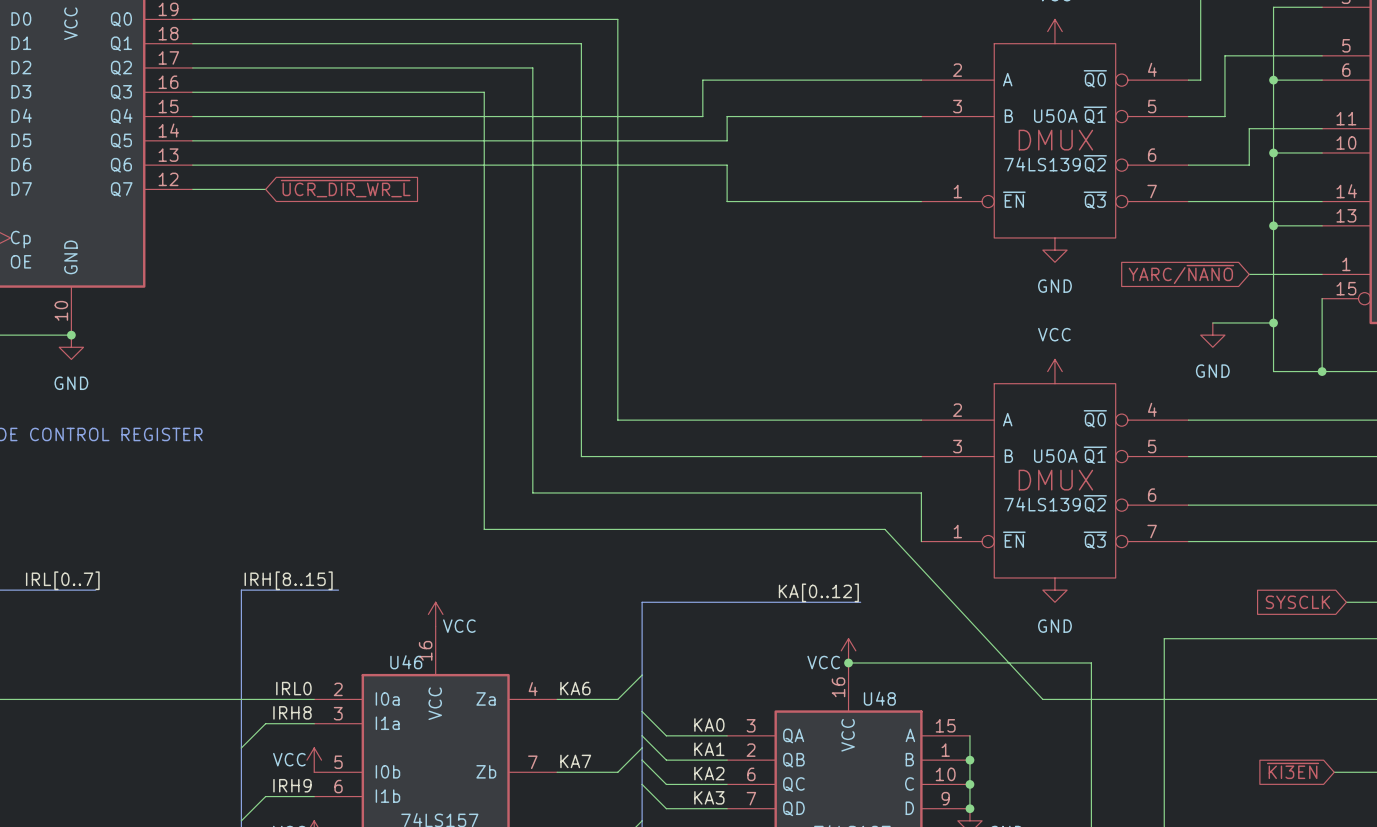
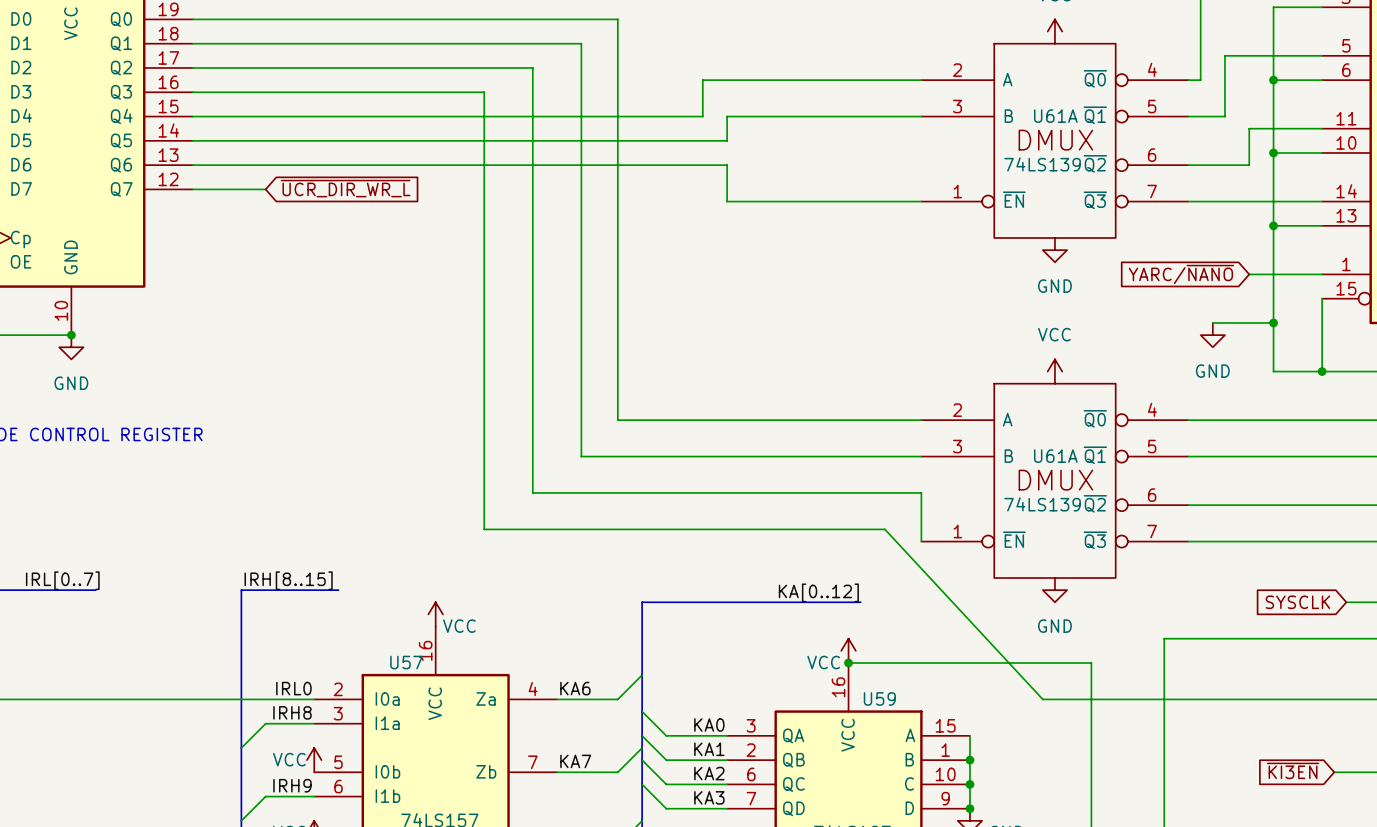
U50A name: U50A (1055, 116) -> U61A (1055, 116)
U50A name: U50A (1055, 456) -> U61A (1055, 456)
U46 name: U46 (406, 662) -> U57 (406, 662)
U48 name: U48 (879, 698) -> U59 (879, 698)

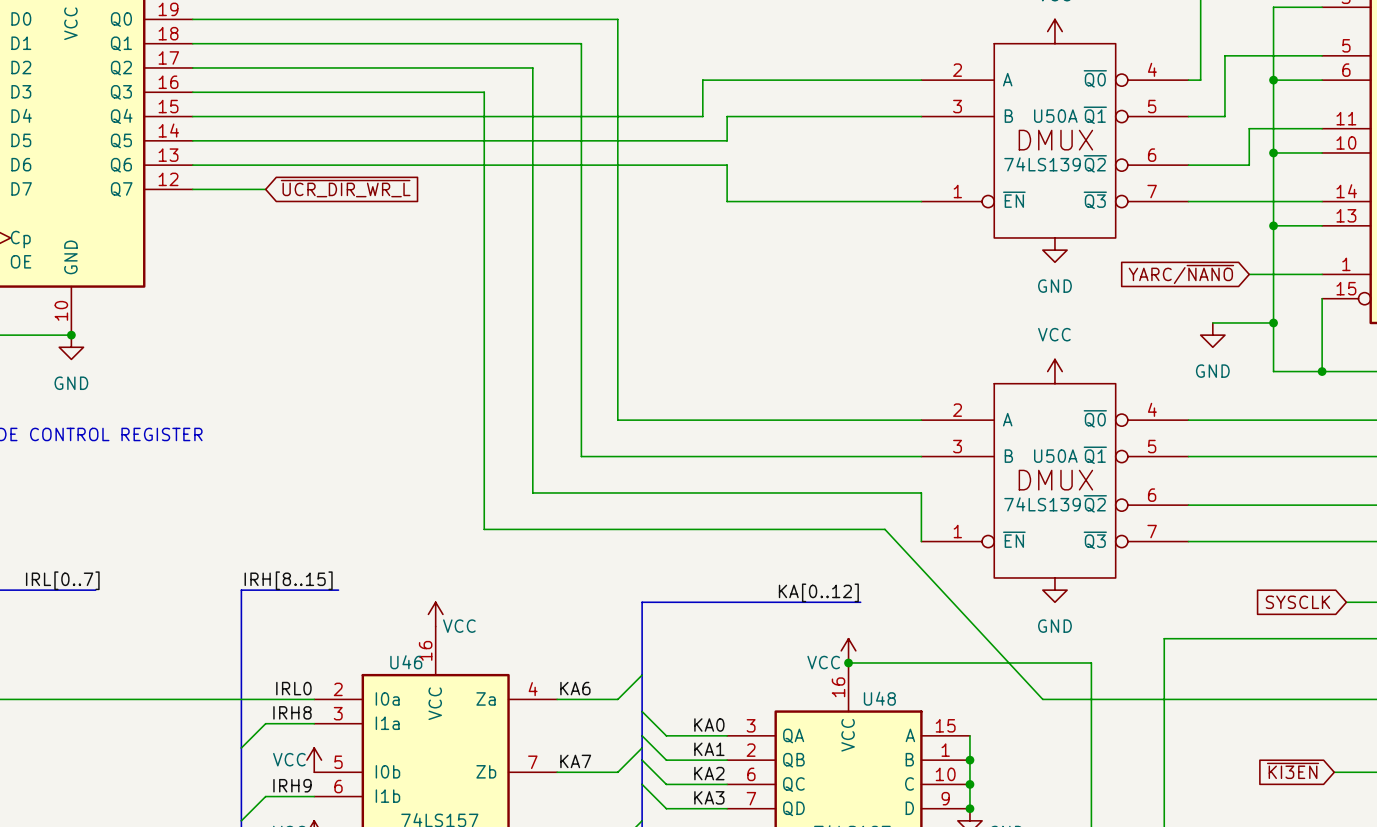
U61A name: U61A (1055, 116) -> U50A (1055, 116)
U61A name: U61A (1055, 456) -> U50A (1055, 456)
U57 name: U57 (406, 662) -> U46 (406, 662)
U59 name: U59 (879, 698) -> U48 (879, 698)

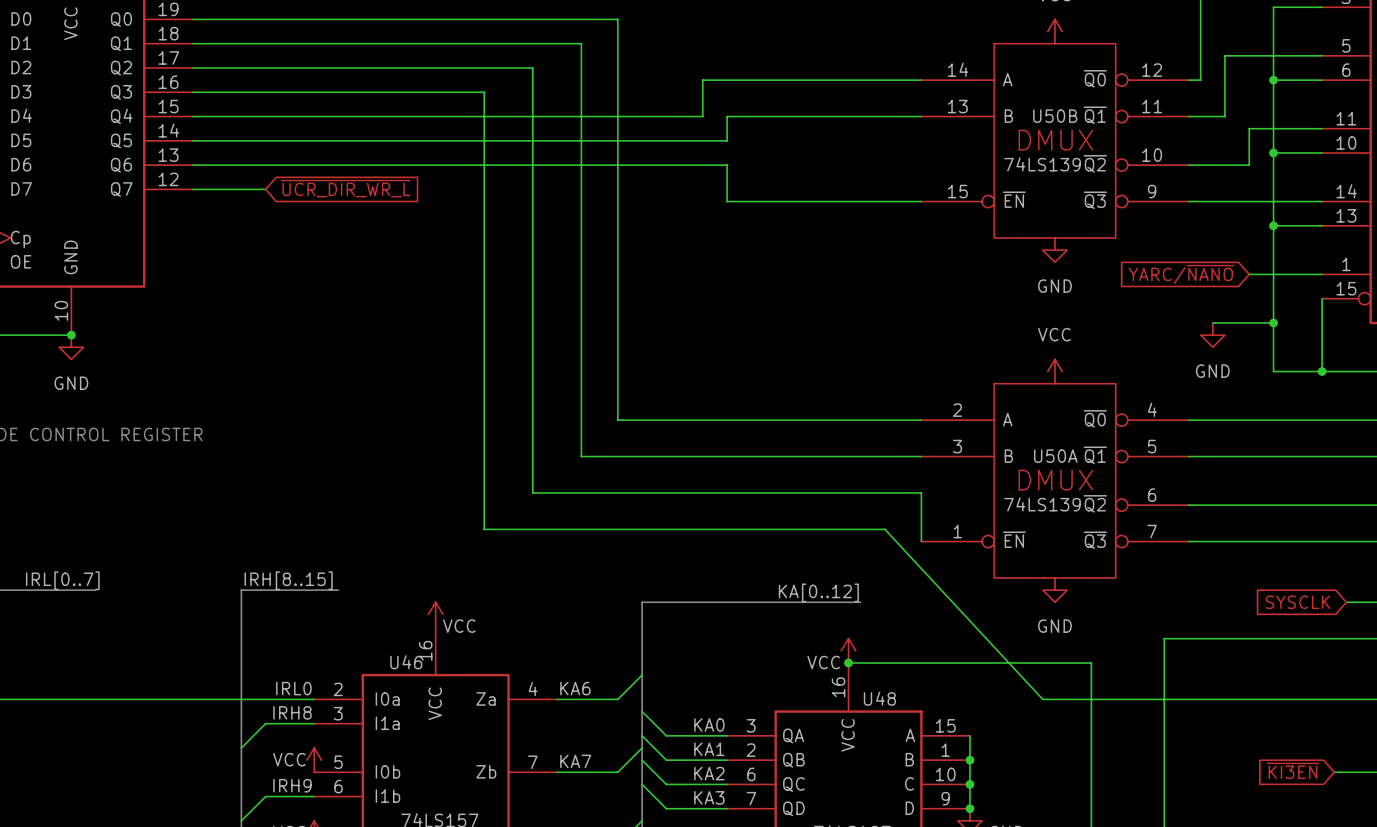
U50A pin number: 4 (1152, 69) -> 12 (1152, 70)
U50A pin number: 2 (957, 70) -> 14 (958, 69)
U50A pin number: 3 (957, 106) -> 13 (957, 106)
U50A pin number: 5 (1152, 106) -> 11 (1152, 106)
U50A name: U50A (1055, 116) -> U50B (1055, 116)
U50A pin number: 6 (1152, 155) -> 10 (1152, 155)
U50A pin number: 1 (957, 191) -> 15 (957, 191)
U50A pin number: 7 (1152, 191) -> 9 (1152, 191)

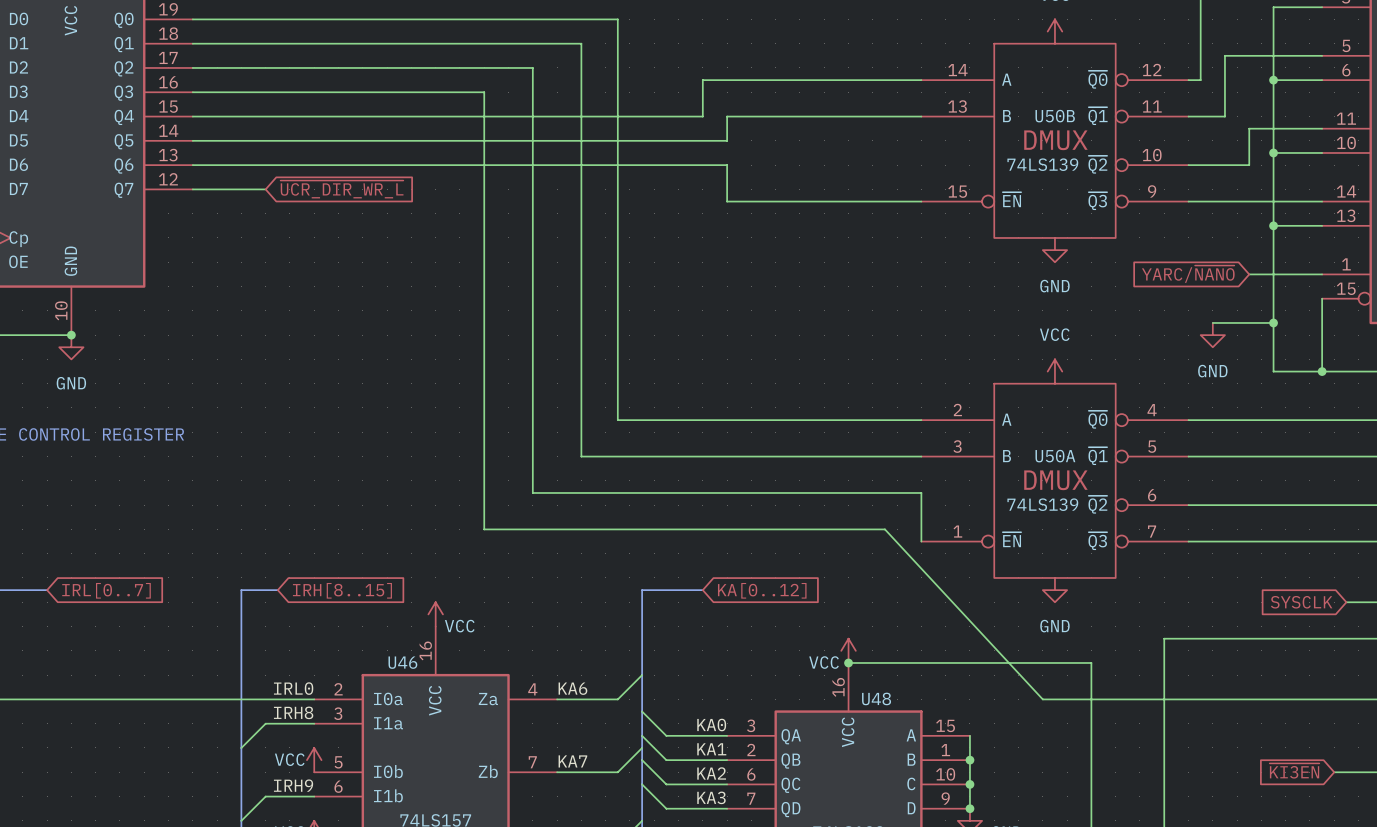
label: IRL[0..7] (62, 580) -> none
label: IRH[8..15] (288, 580) -> none
bus: (47, 590) (95, 590) -> none
bus: (277, 590) (338, 590) -> none
global label: none -> IRL[0..7] (106, 590)
global label: none -> IRH[8..15] (342, 590)
global label: none -> KA[0..12] (762, 590)
label: KA[0..12] (818, 592) -> none
bus: (642, 602) (860, 602) -> (642, 602) (642, 590) (702, 590)

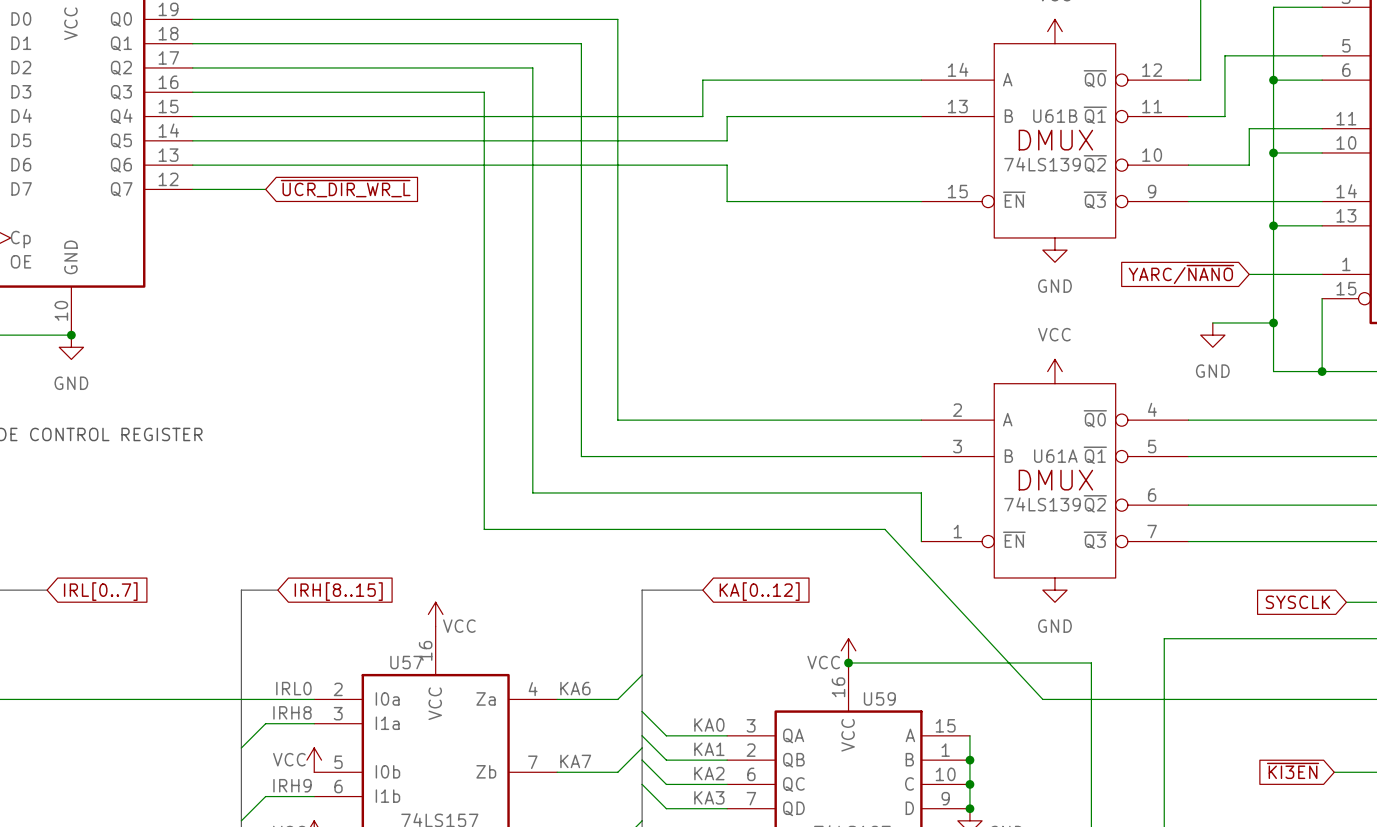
U50B name: U50B (1055, 116) -> U61B (1055, 116)
U50A name: U50A (1055, 456) -> U61A (1055, 456)
U46 name: U46 (402, 662) -> U57 (406, 662)
U48 name: U48 (876, 698) -> U59 (879, 698)

